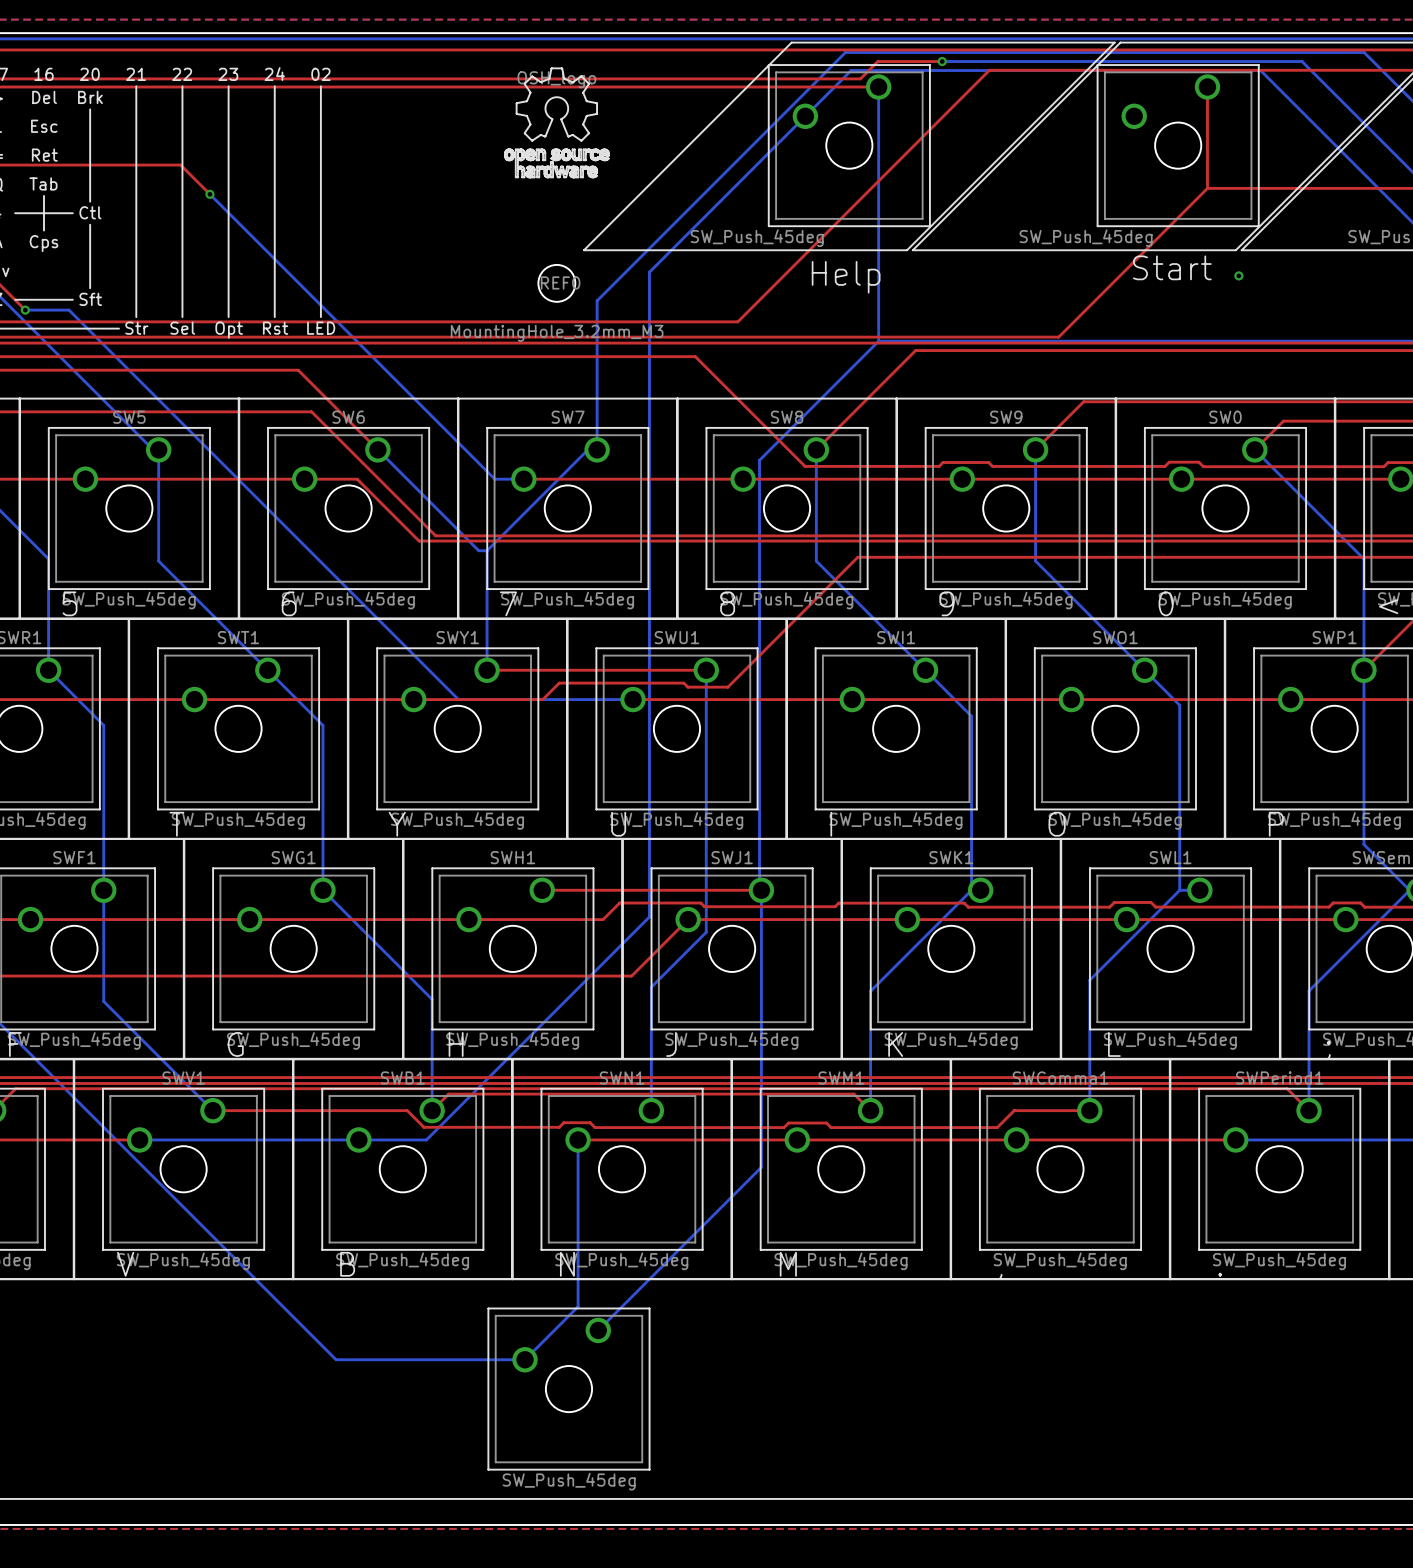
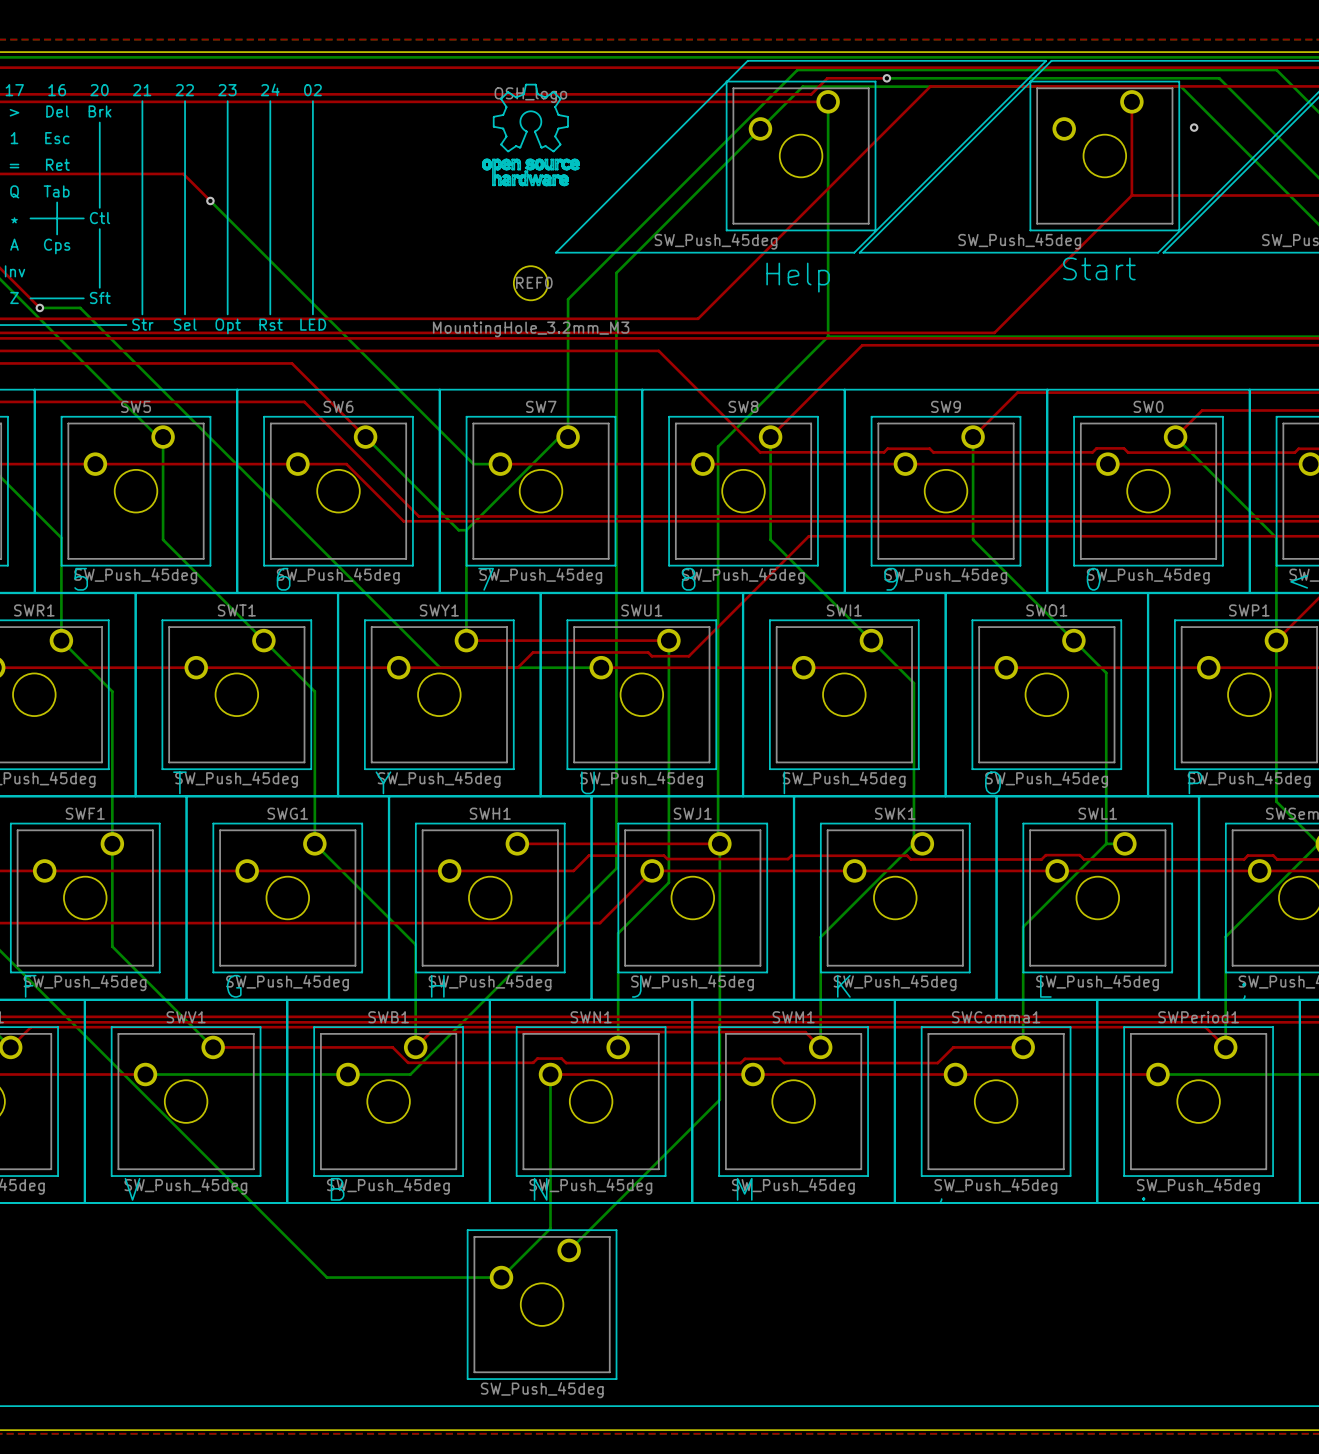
via: none -> (1194, 127)
via: (1238, 275) -> none

